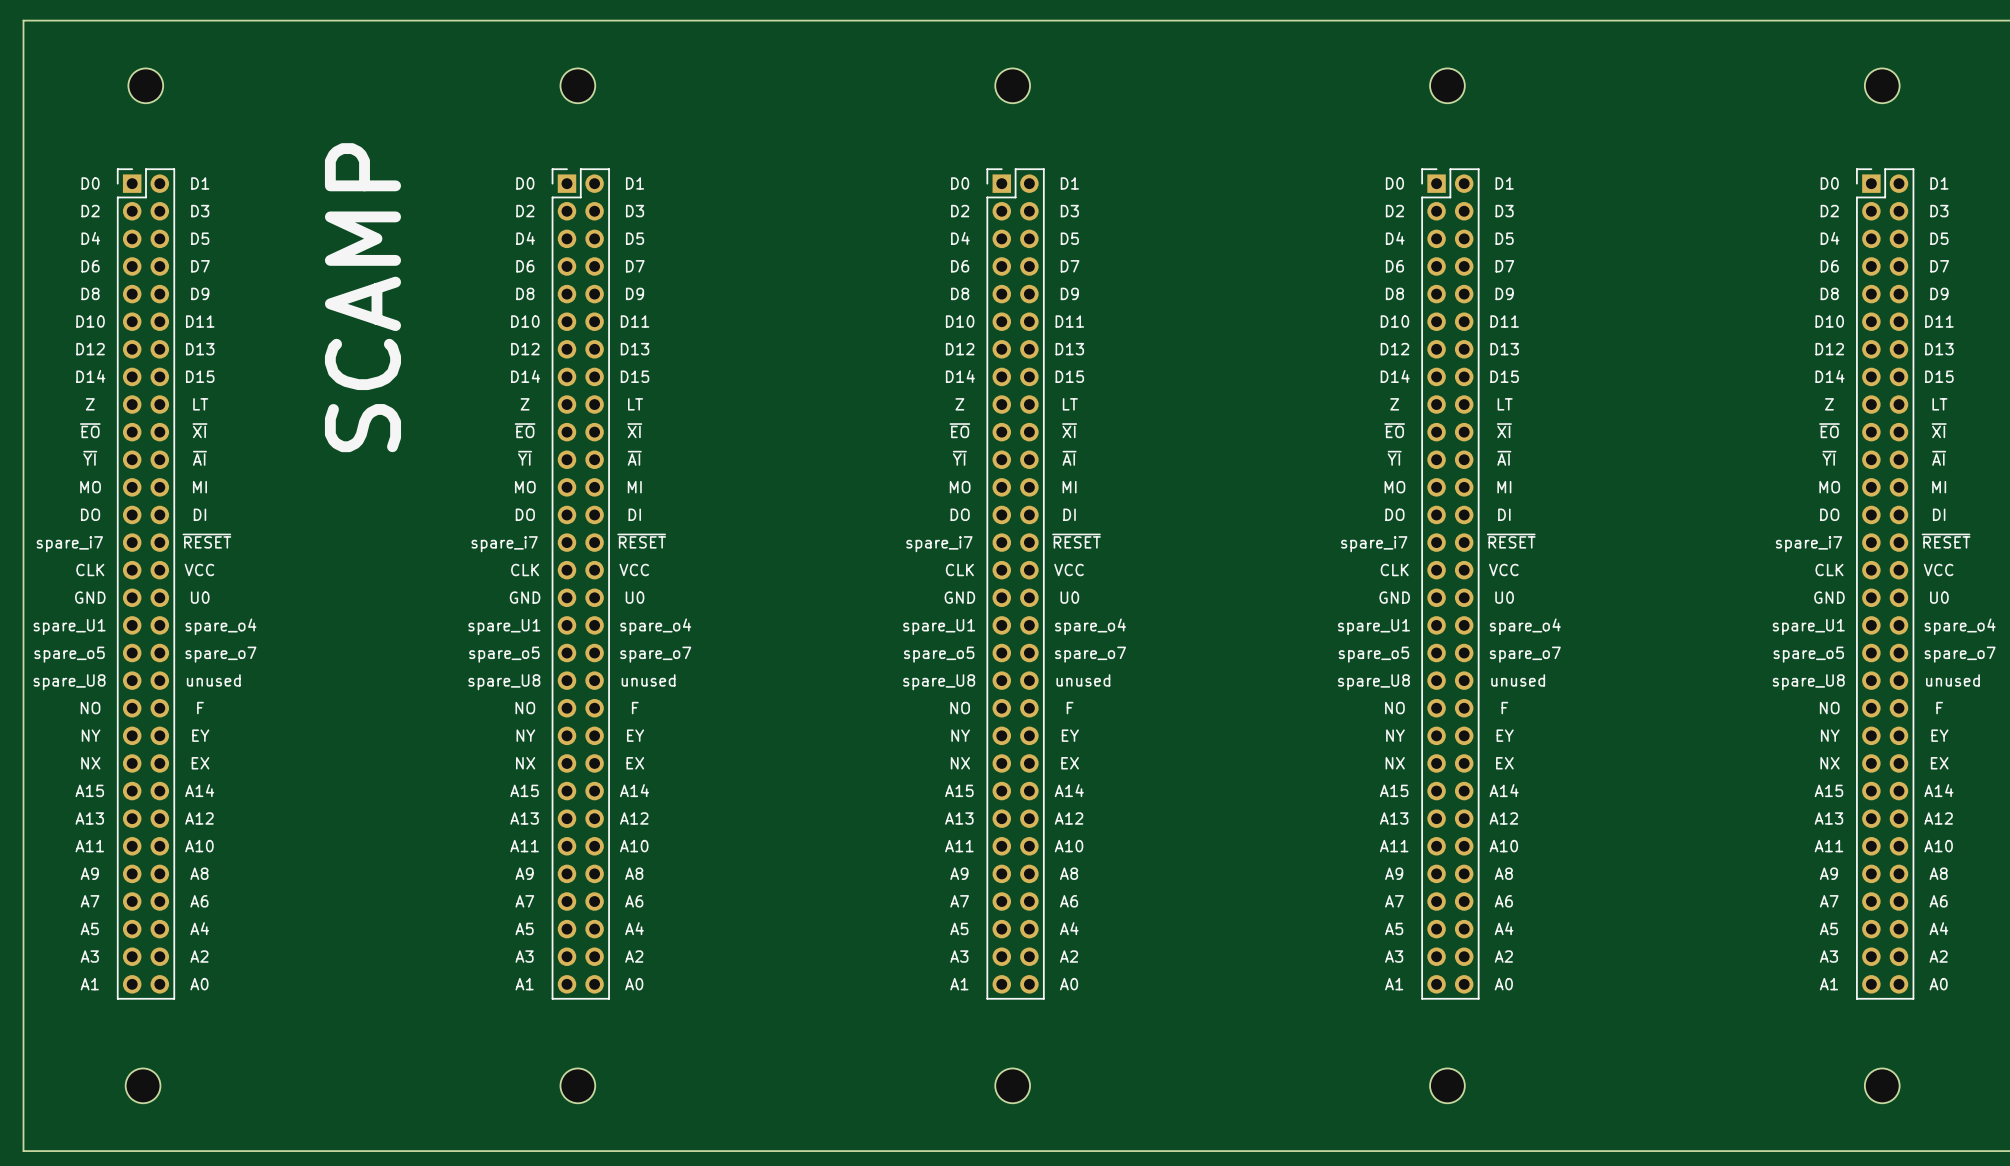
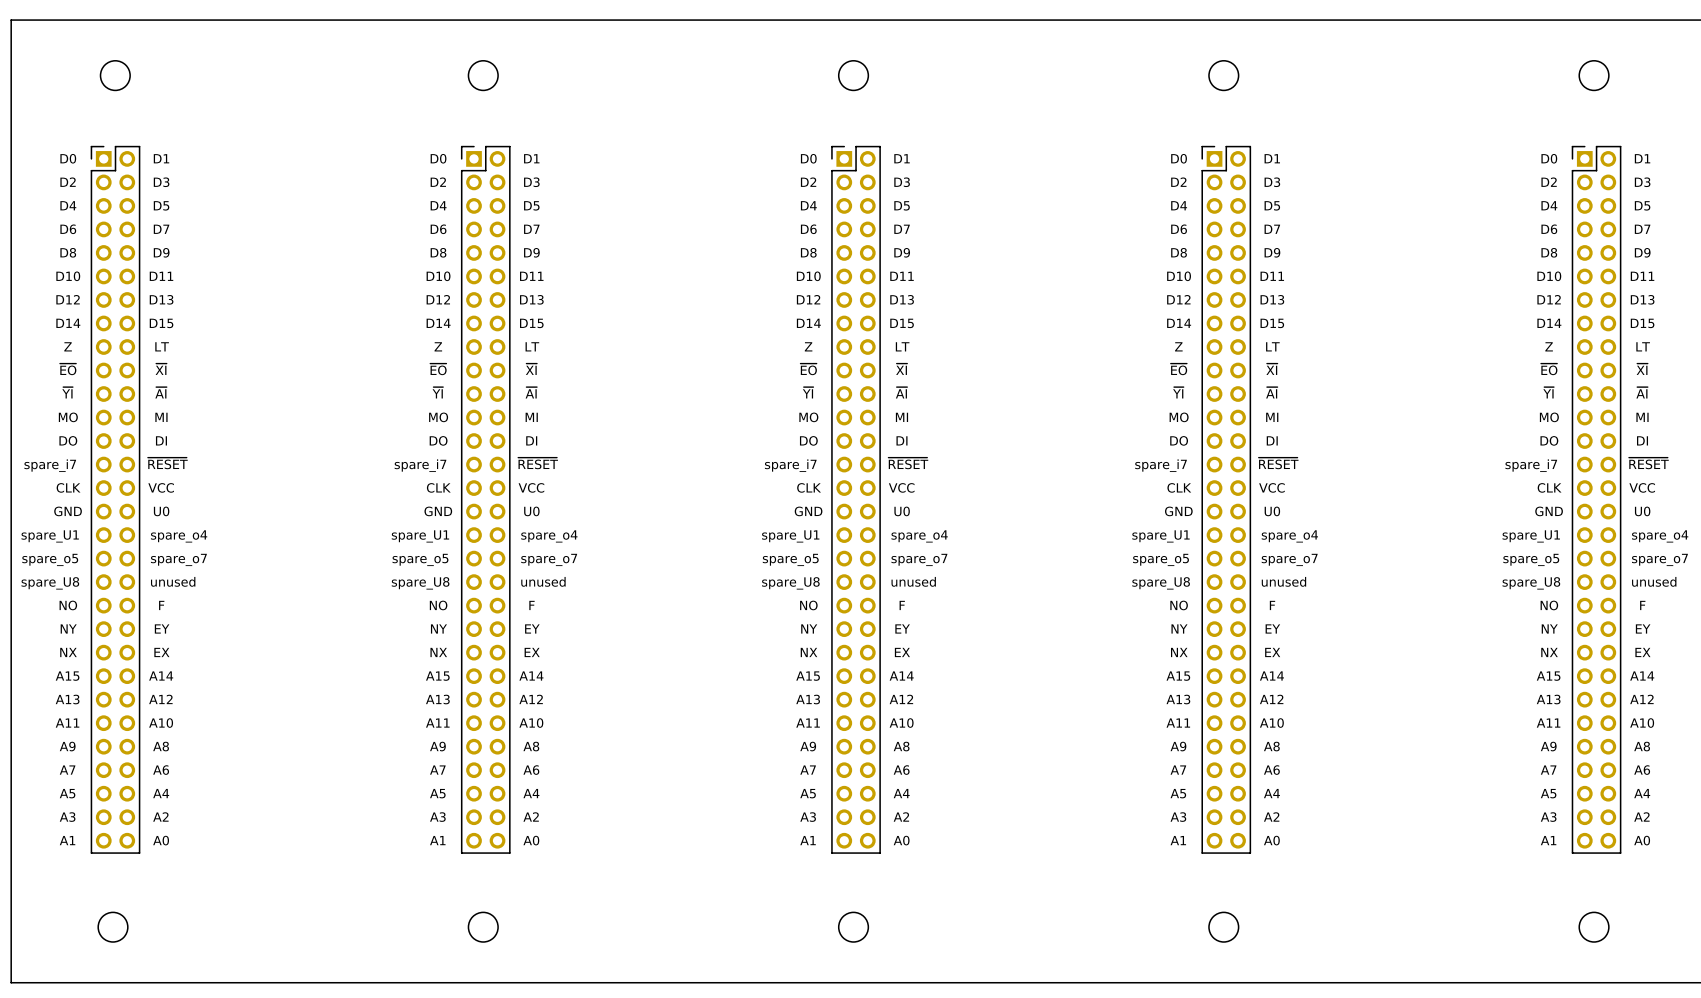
text: SCAMP (362, 297) -> none

